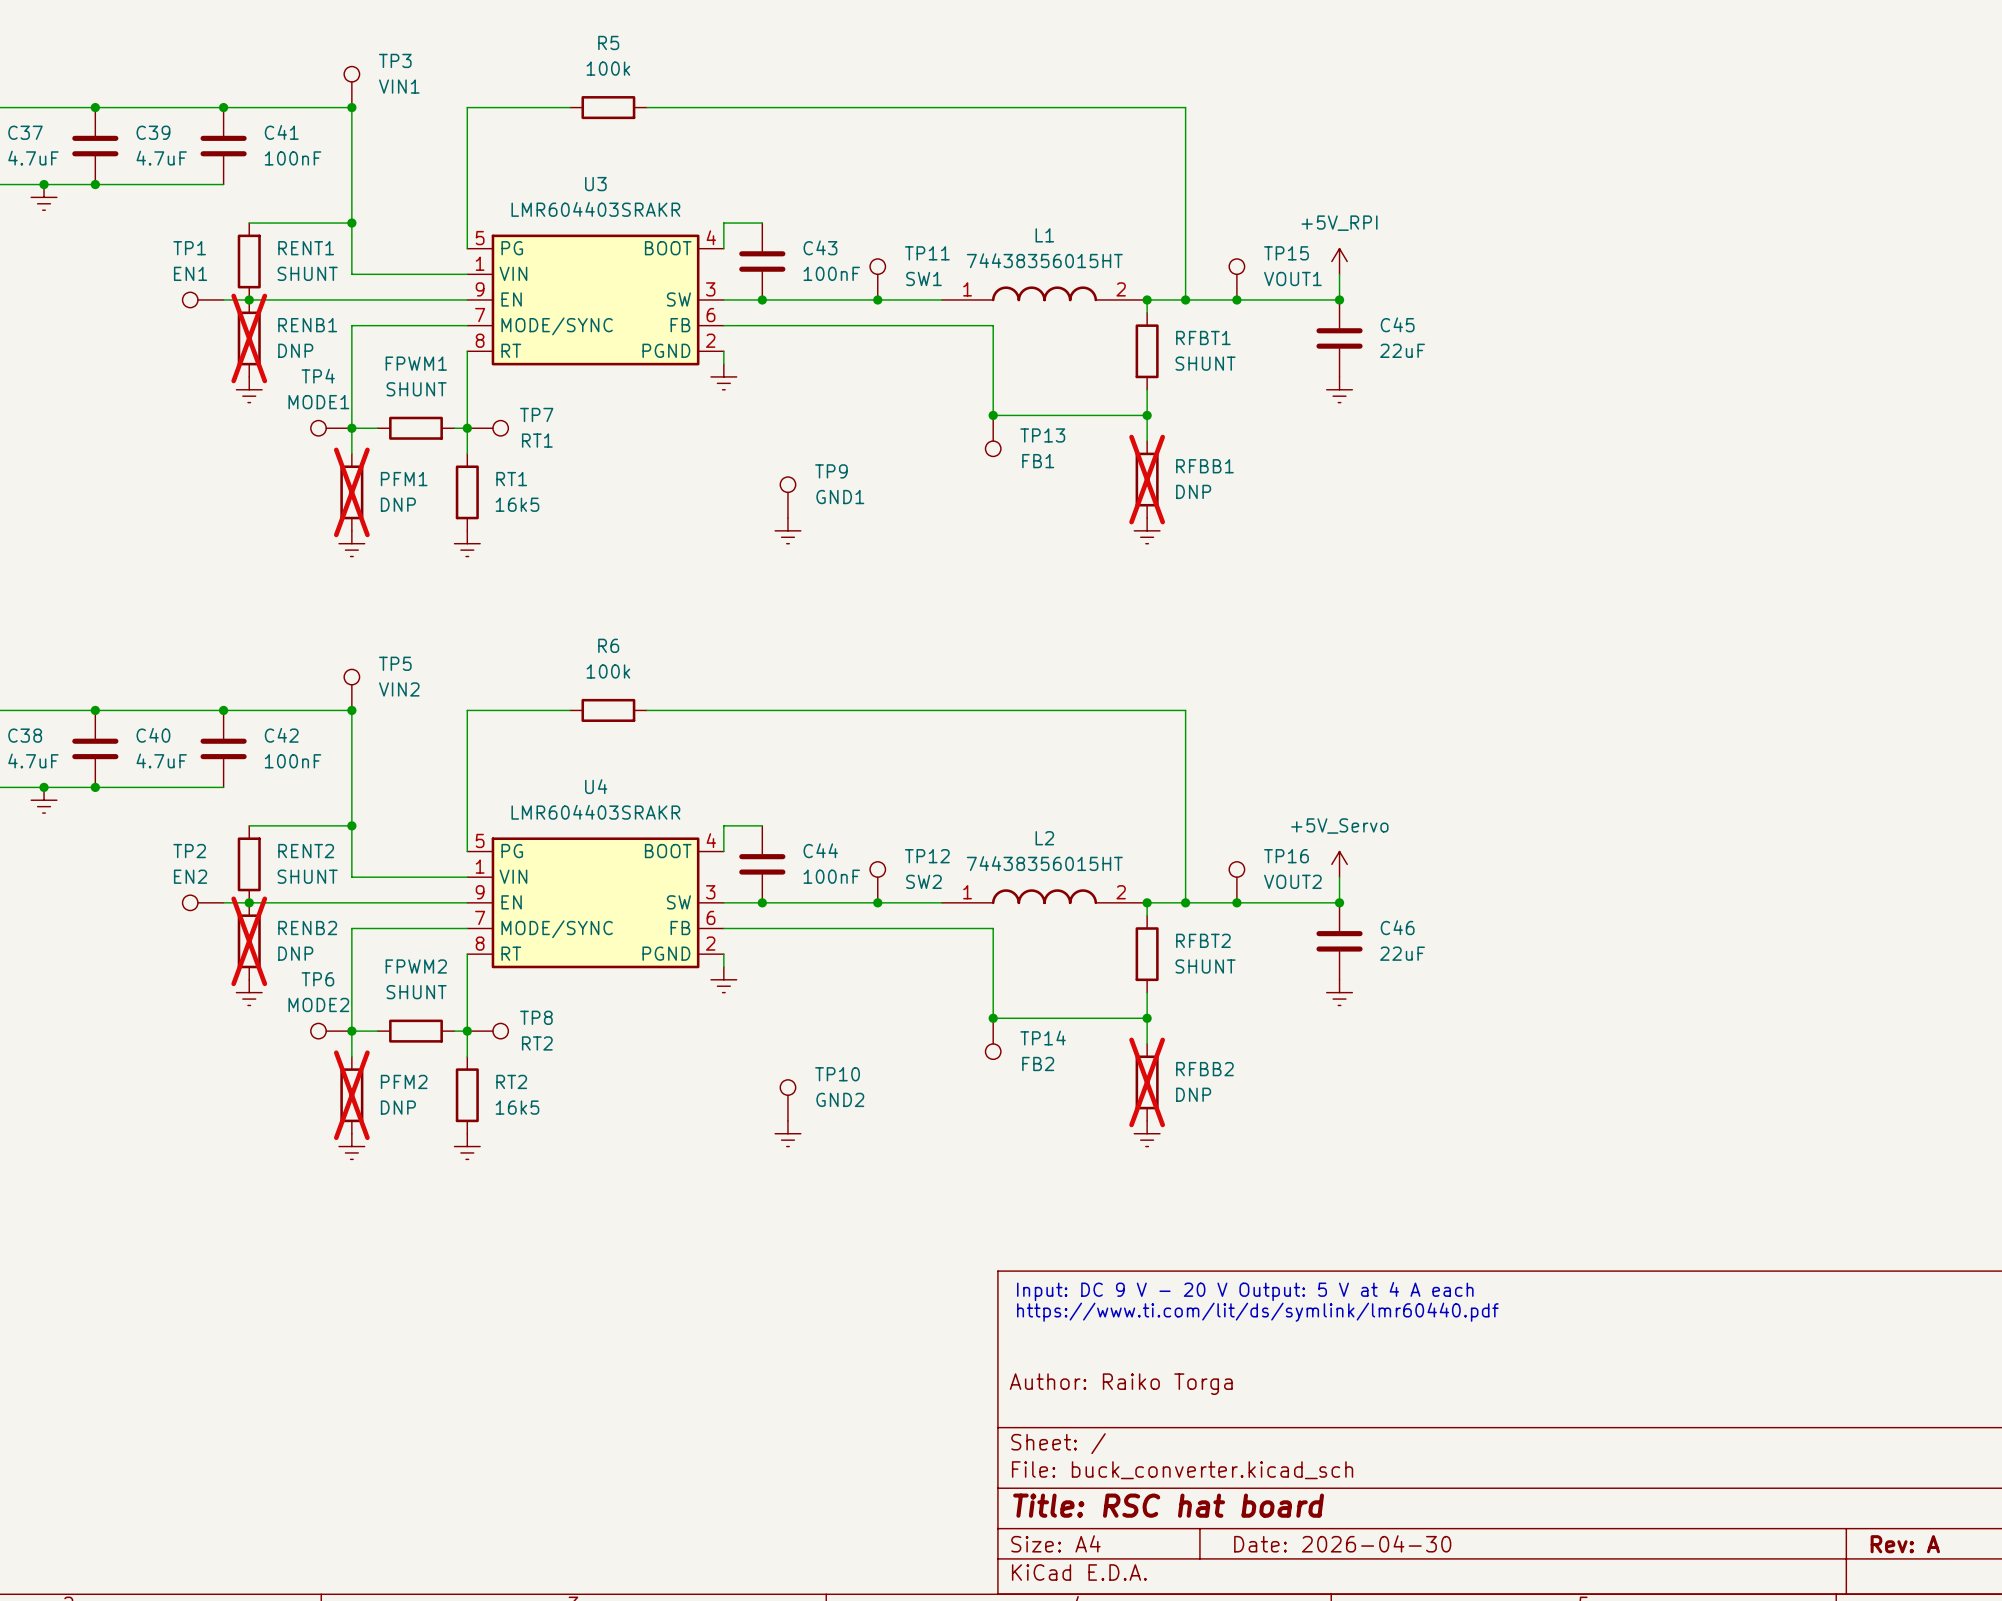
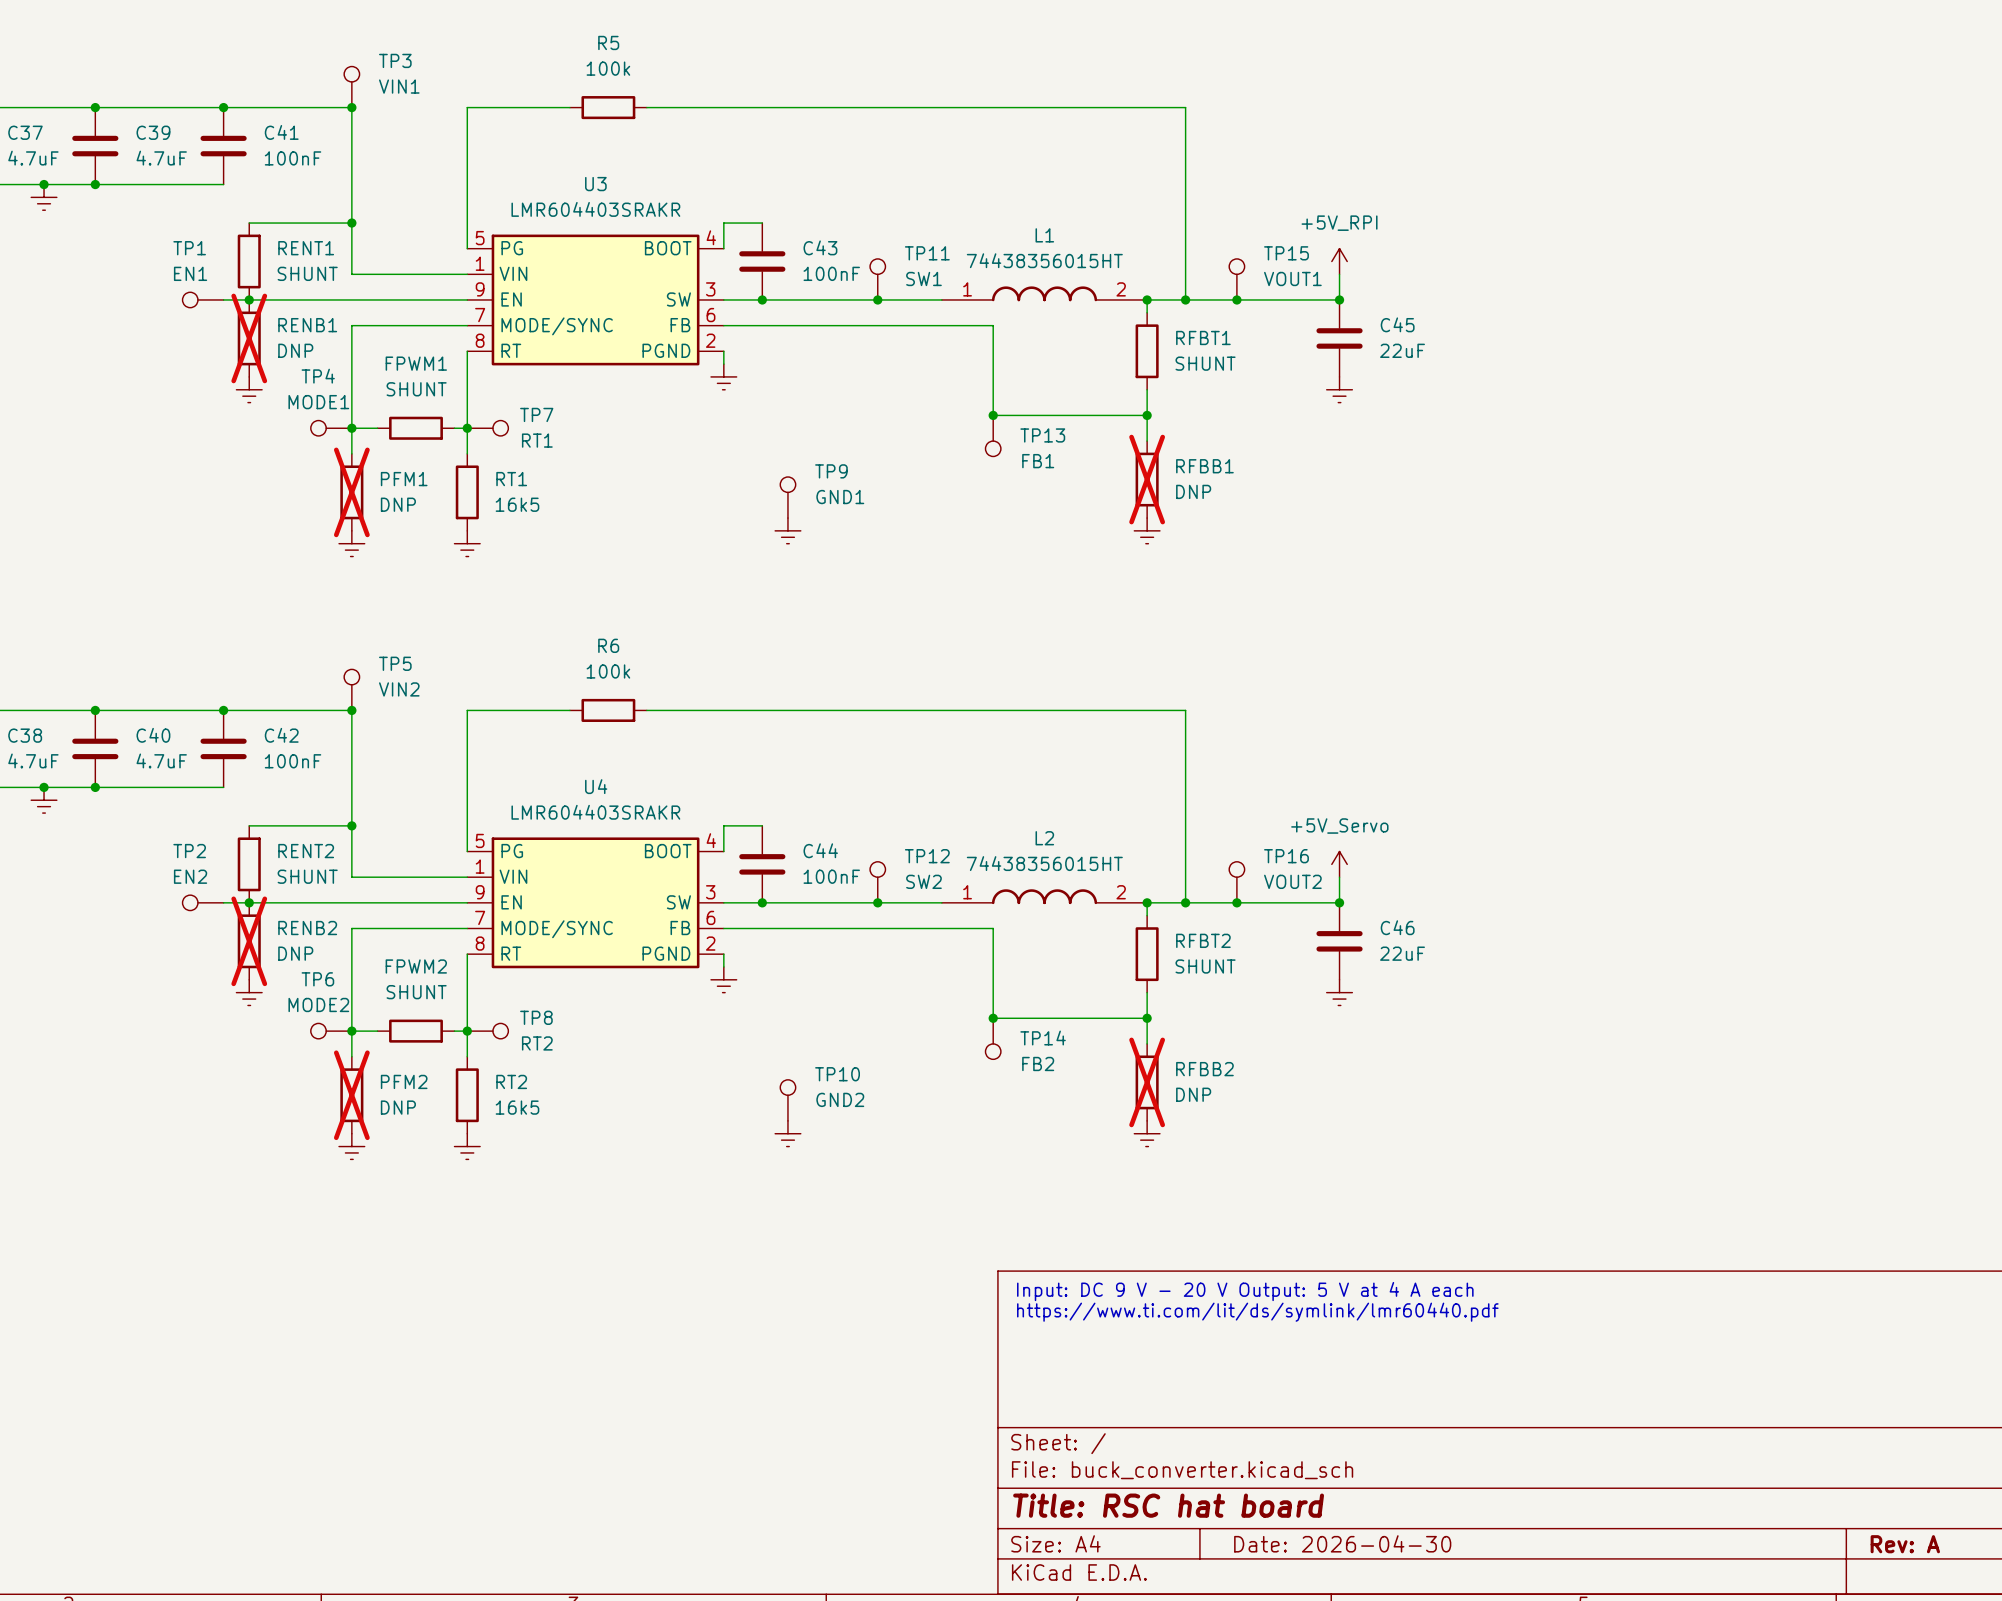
title block: Author: Raiko Torga (1121, 1384) -> none

